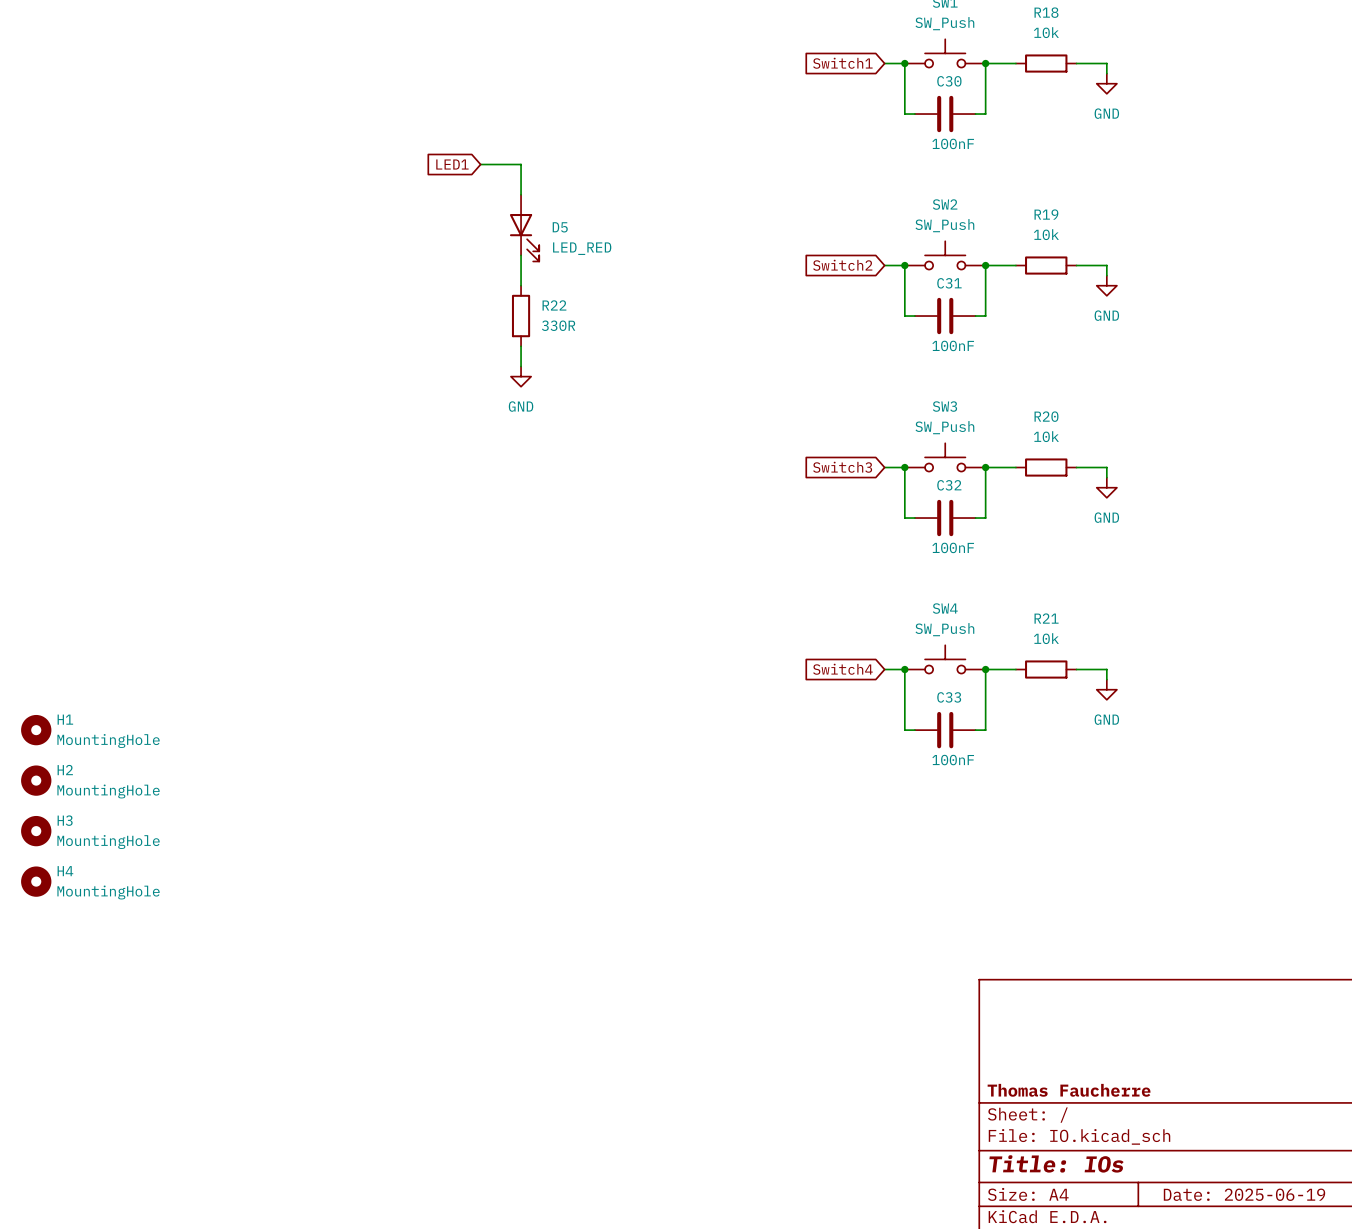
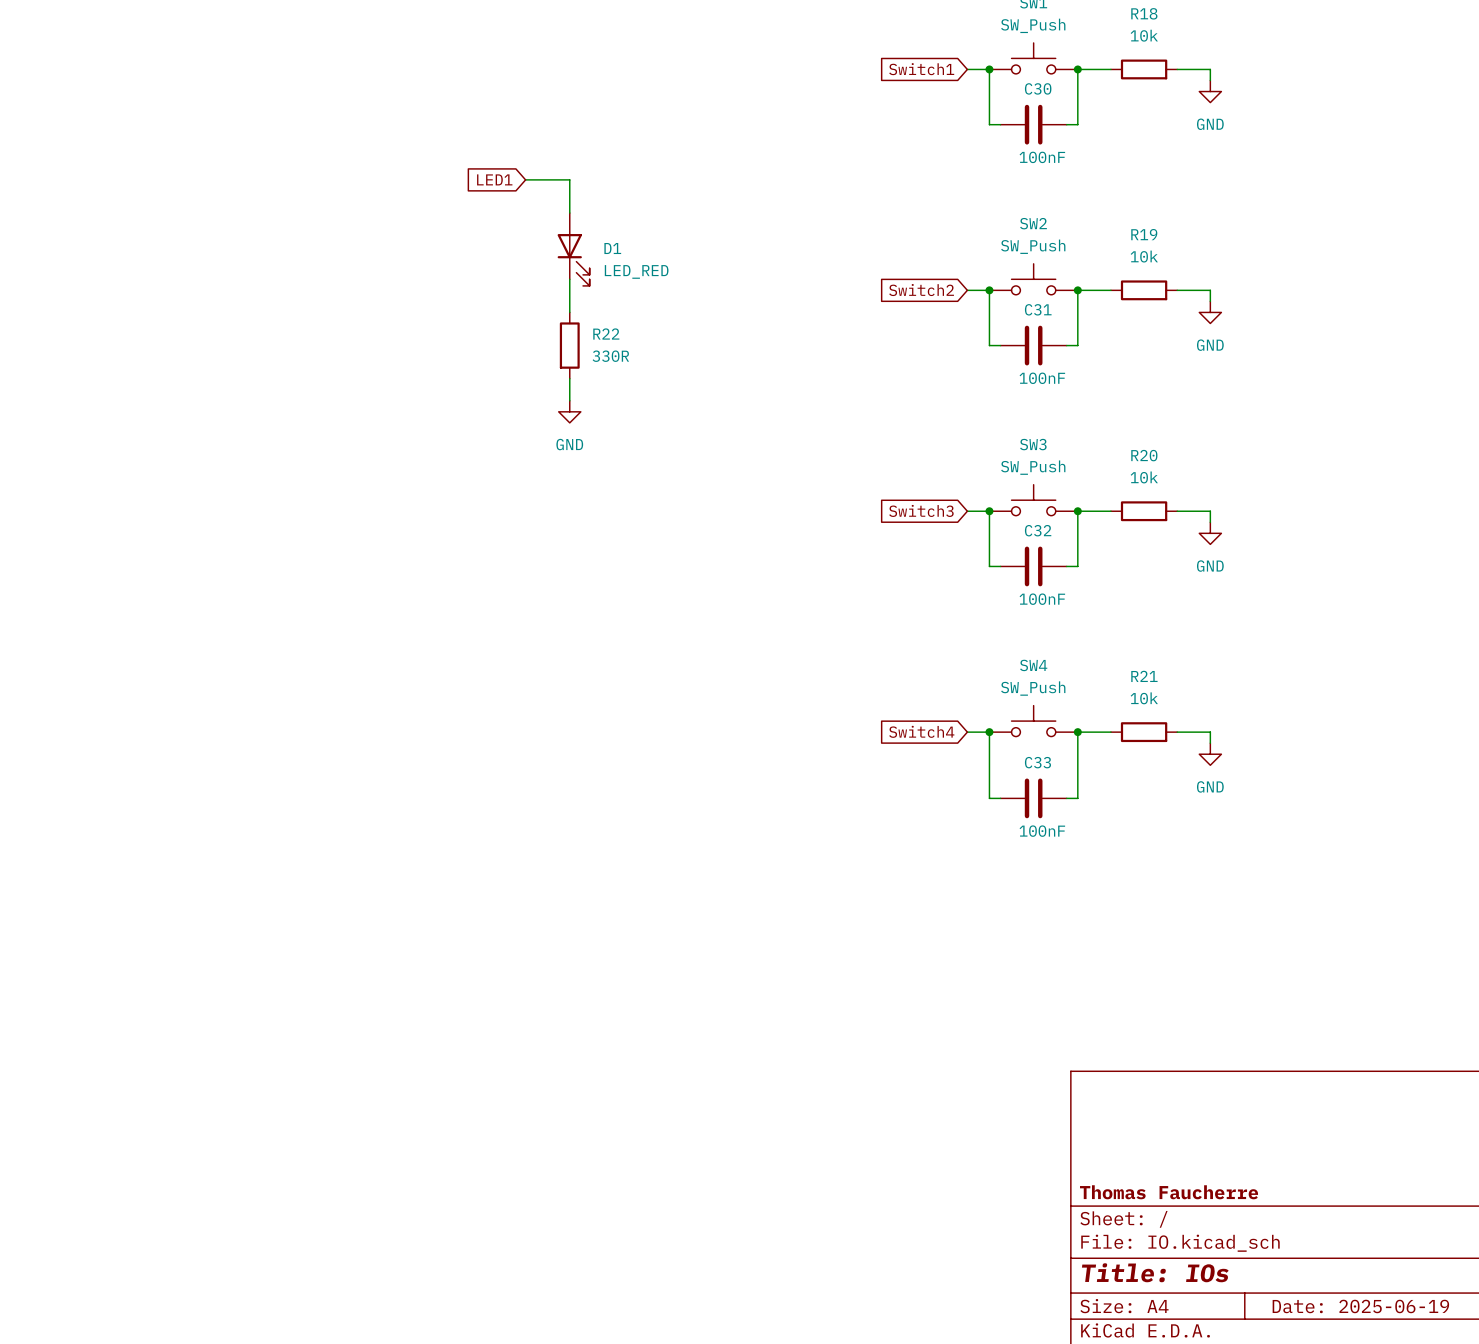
D5 name: D5 (560, 227) -> D1 (612, 248)
H1: MountingHole (36, 730) -> none
H2: MountingHole (36, 780) -> none
H3: MountingHole (36, 831) -> none
H4: MountingHole (36, 881) -> none

